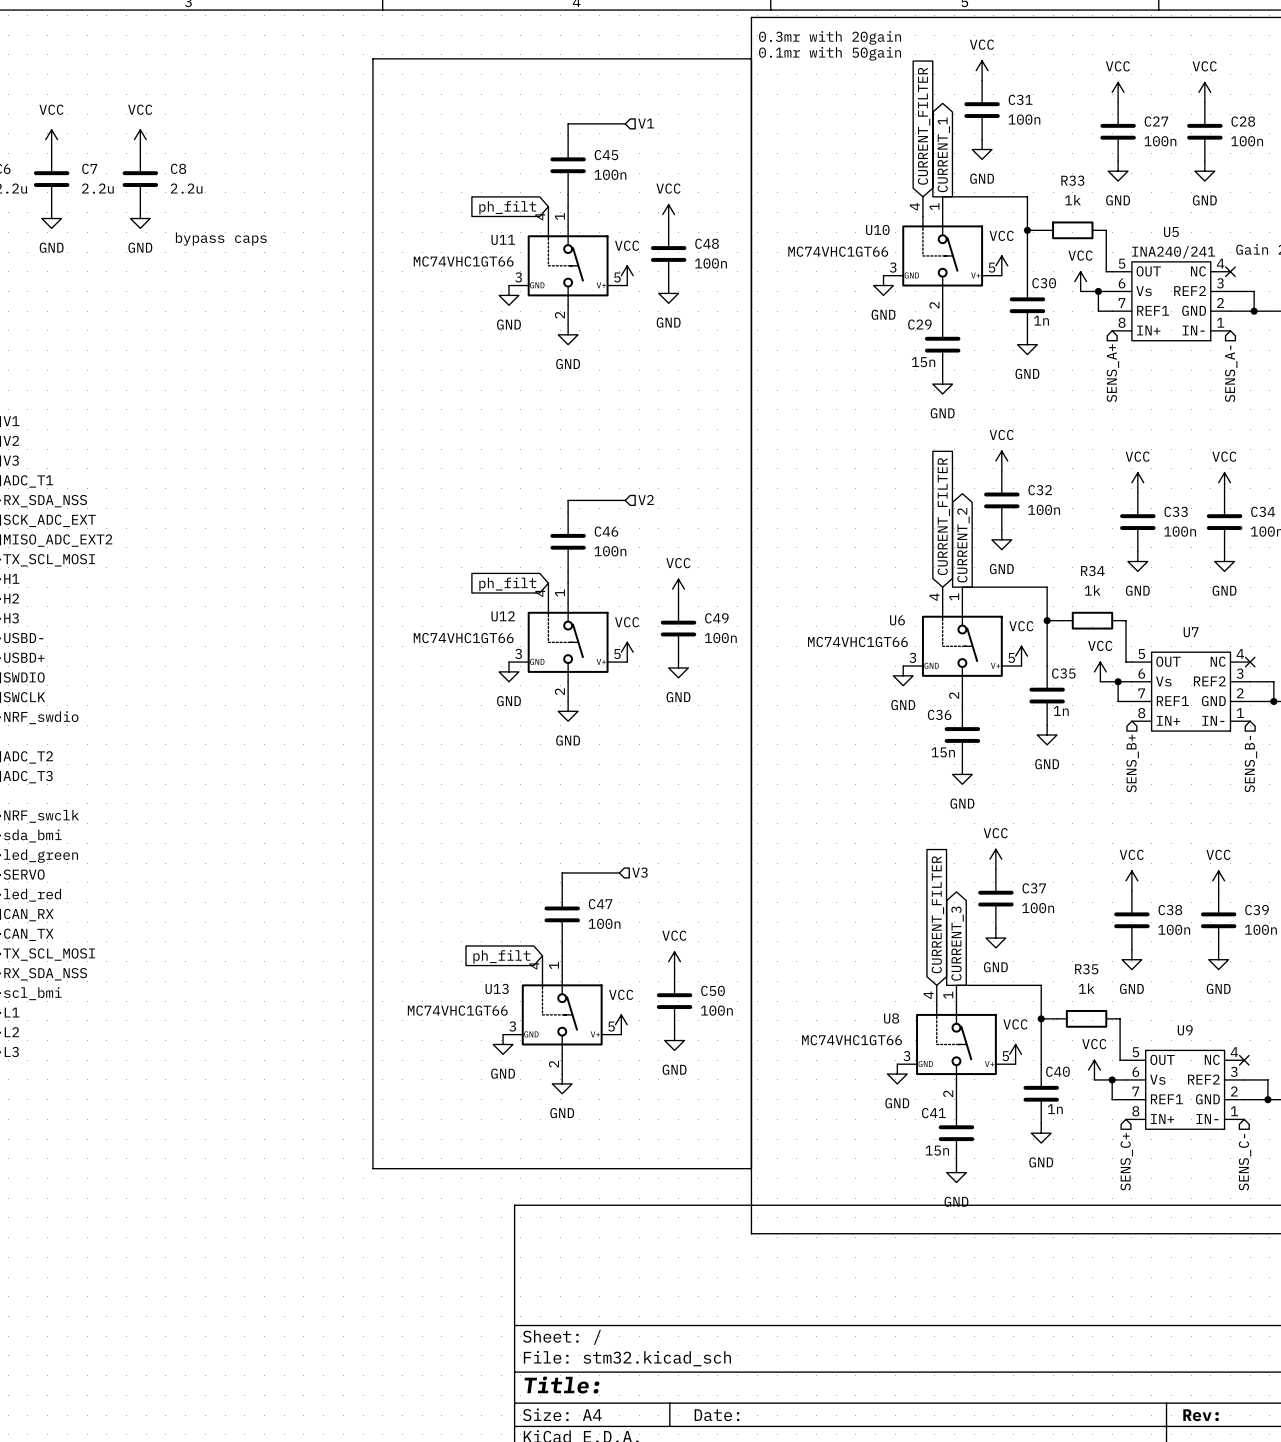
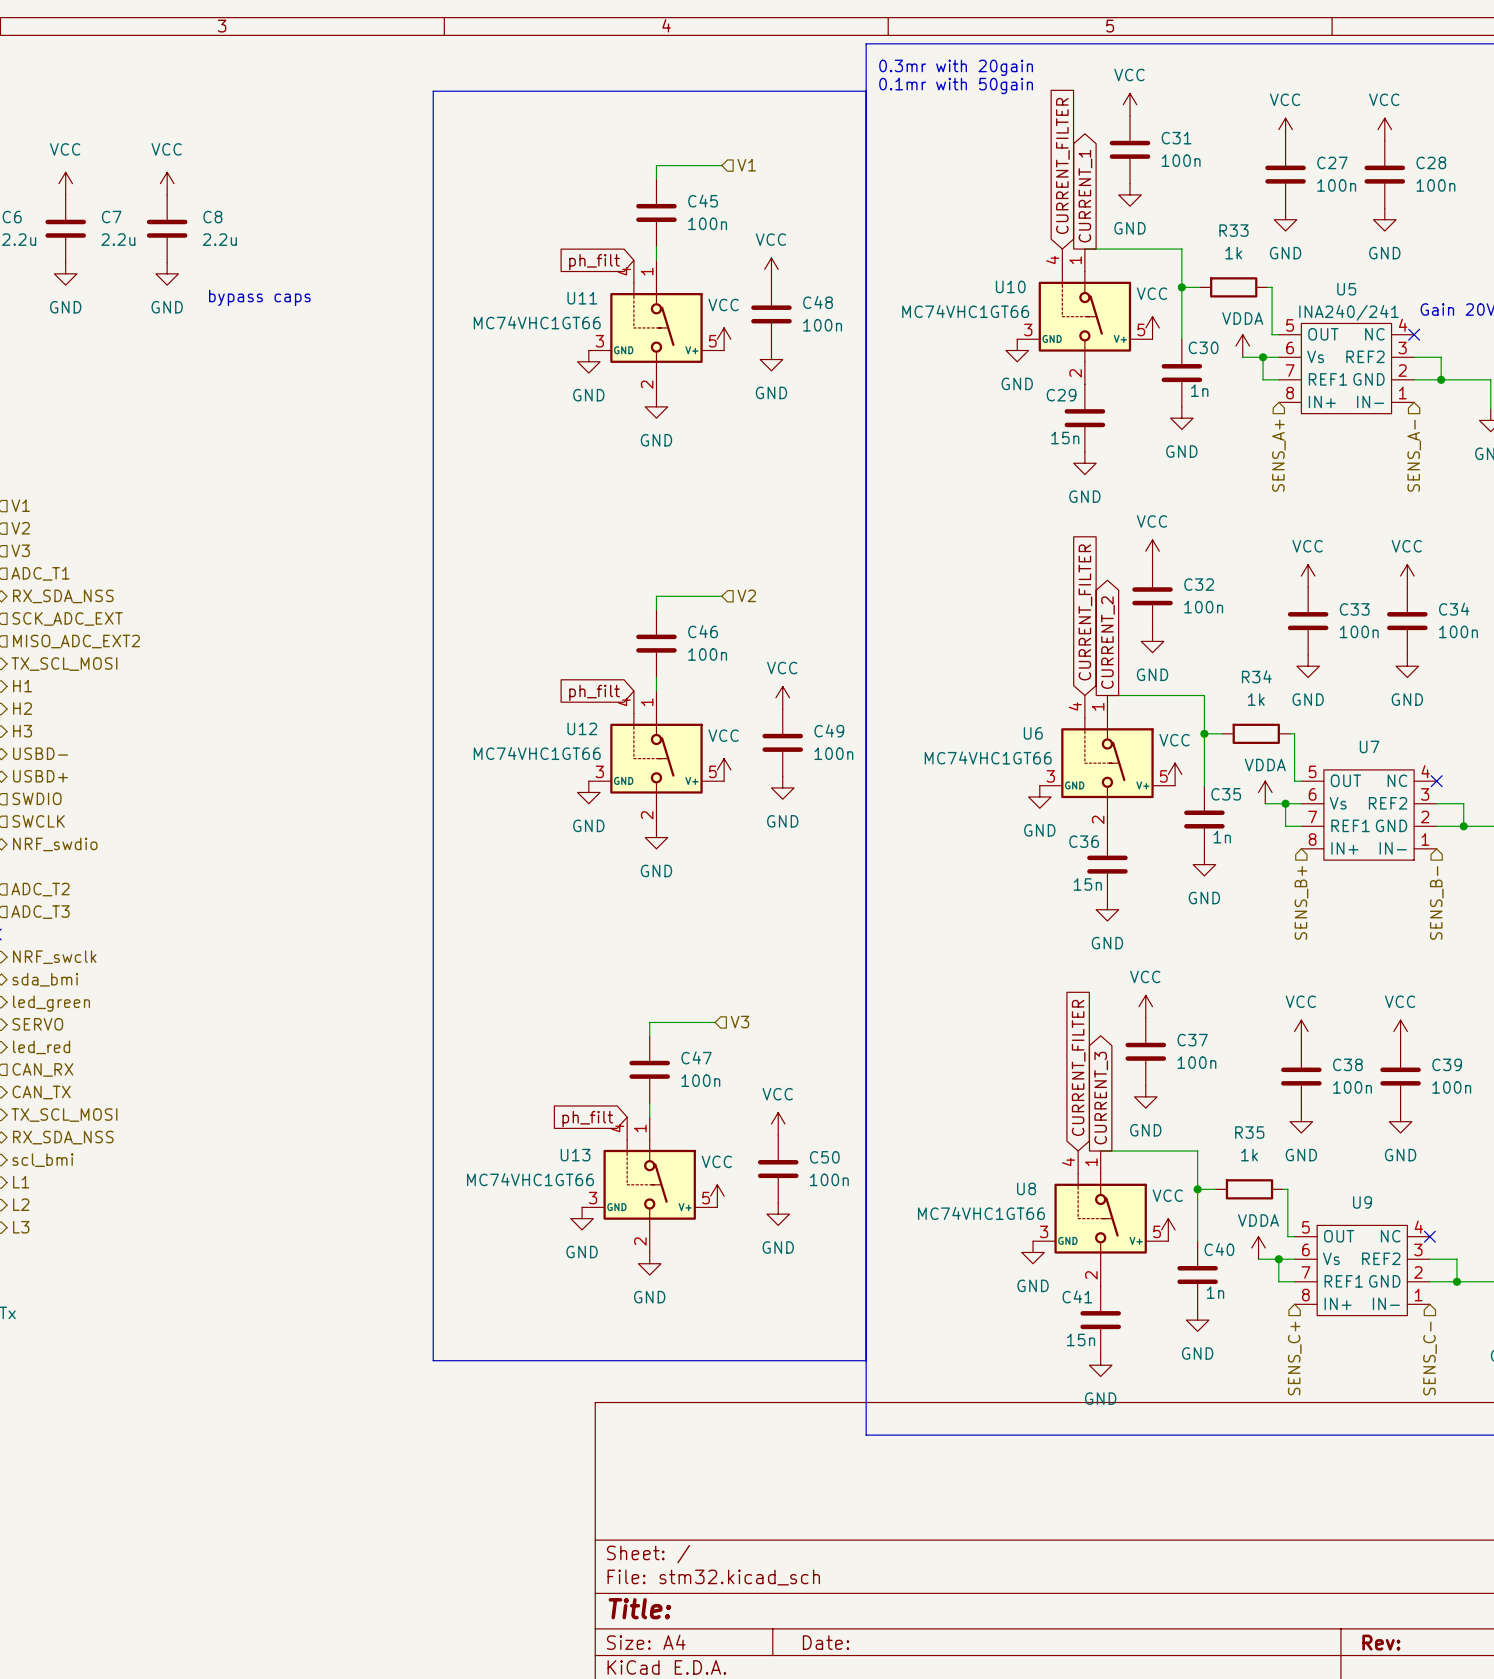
power symbol: VCC (1080, 281) -> VDDA (1242, 346)
power symbol: VCC (1100, 671) -> VDDA (1265, 792)
power symbol: VCC (1094, 1070) -> VDDA (1258, 1247)

